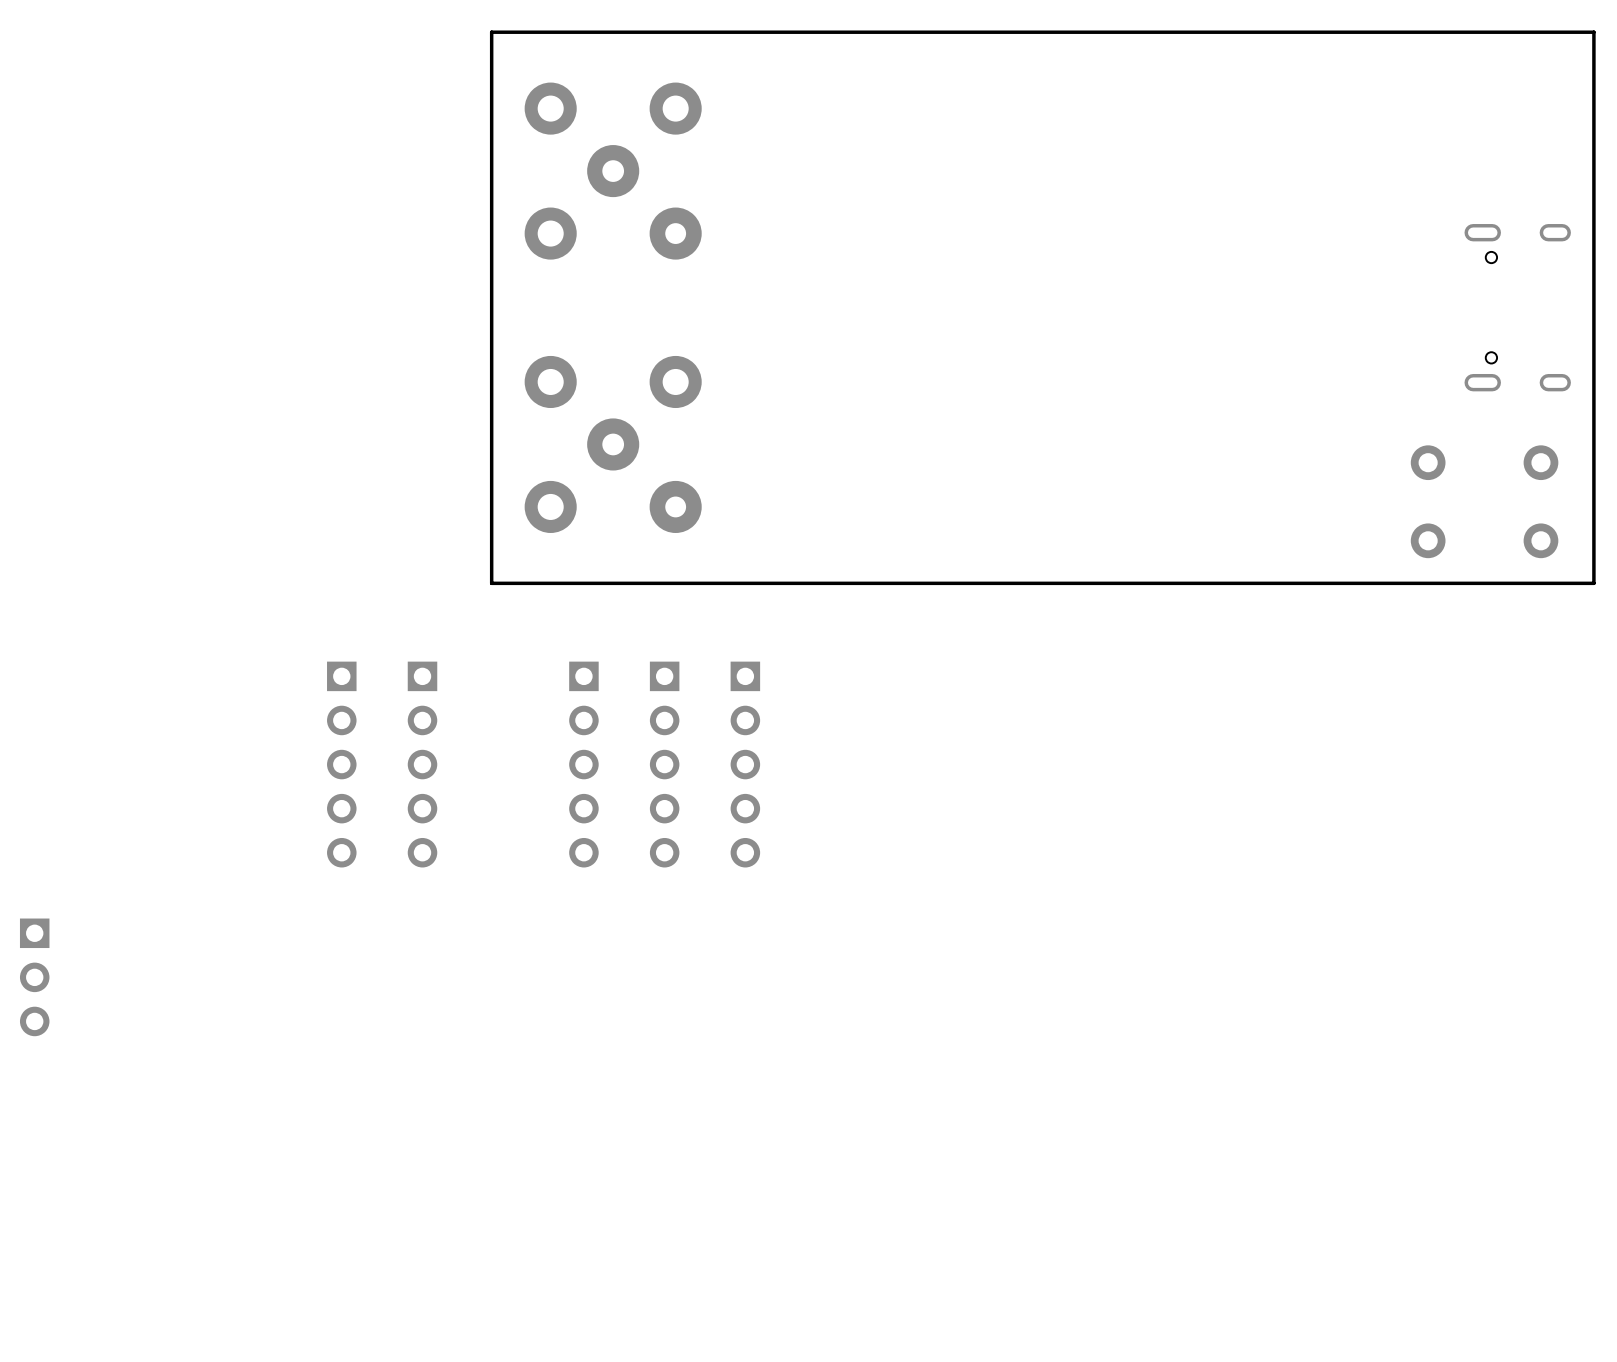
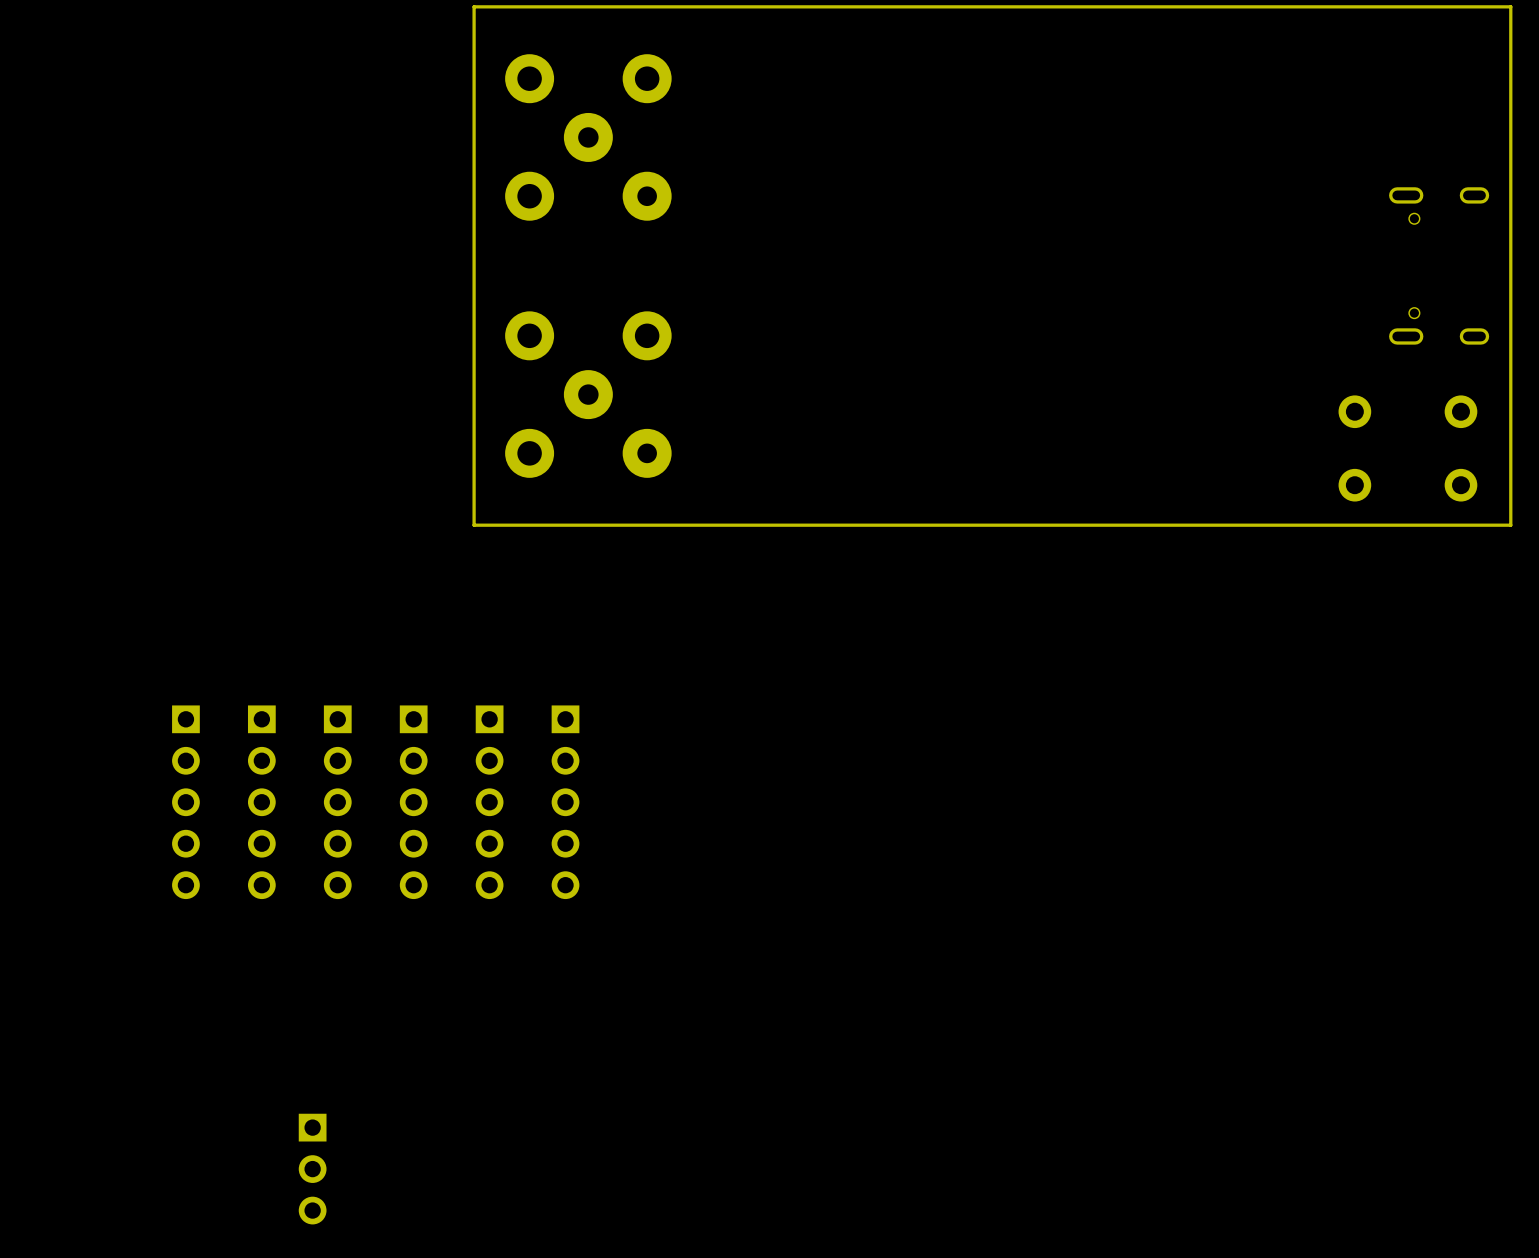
part: (341, 764) -> none
part: (422, 764) -> none
part: (583, 764) -> none
part: (664, 764) -> none
part: (745, 764) -> none
part: none -> (185, 802)
part: none -> (261, 802)
part: none -> (337, 802)
part: none -> (413, 802)
part: none -> (489, 802)
part: none -> (565, 802)
part position: (34, 977) -> (312, 1169)

